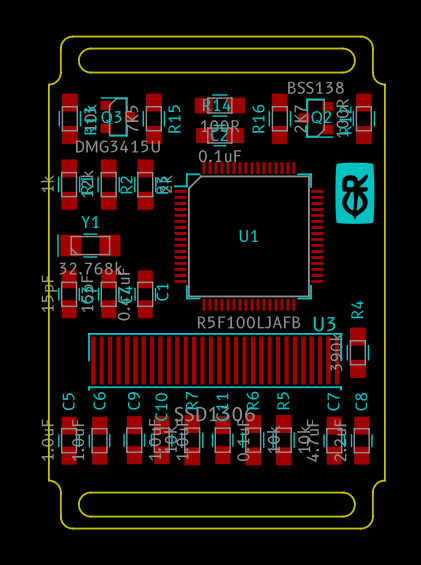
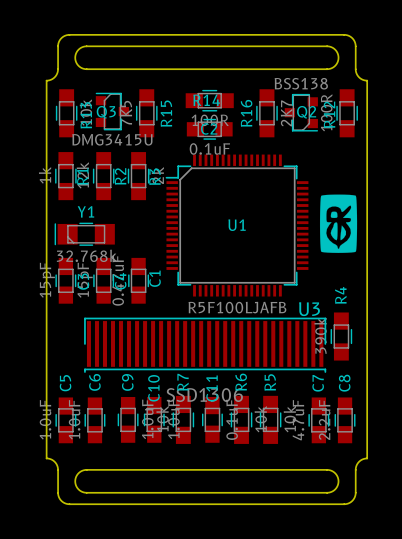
drawing position: (354, 193) -> (338, 223)

